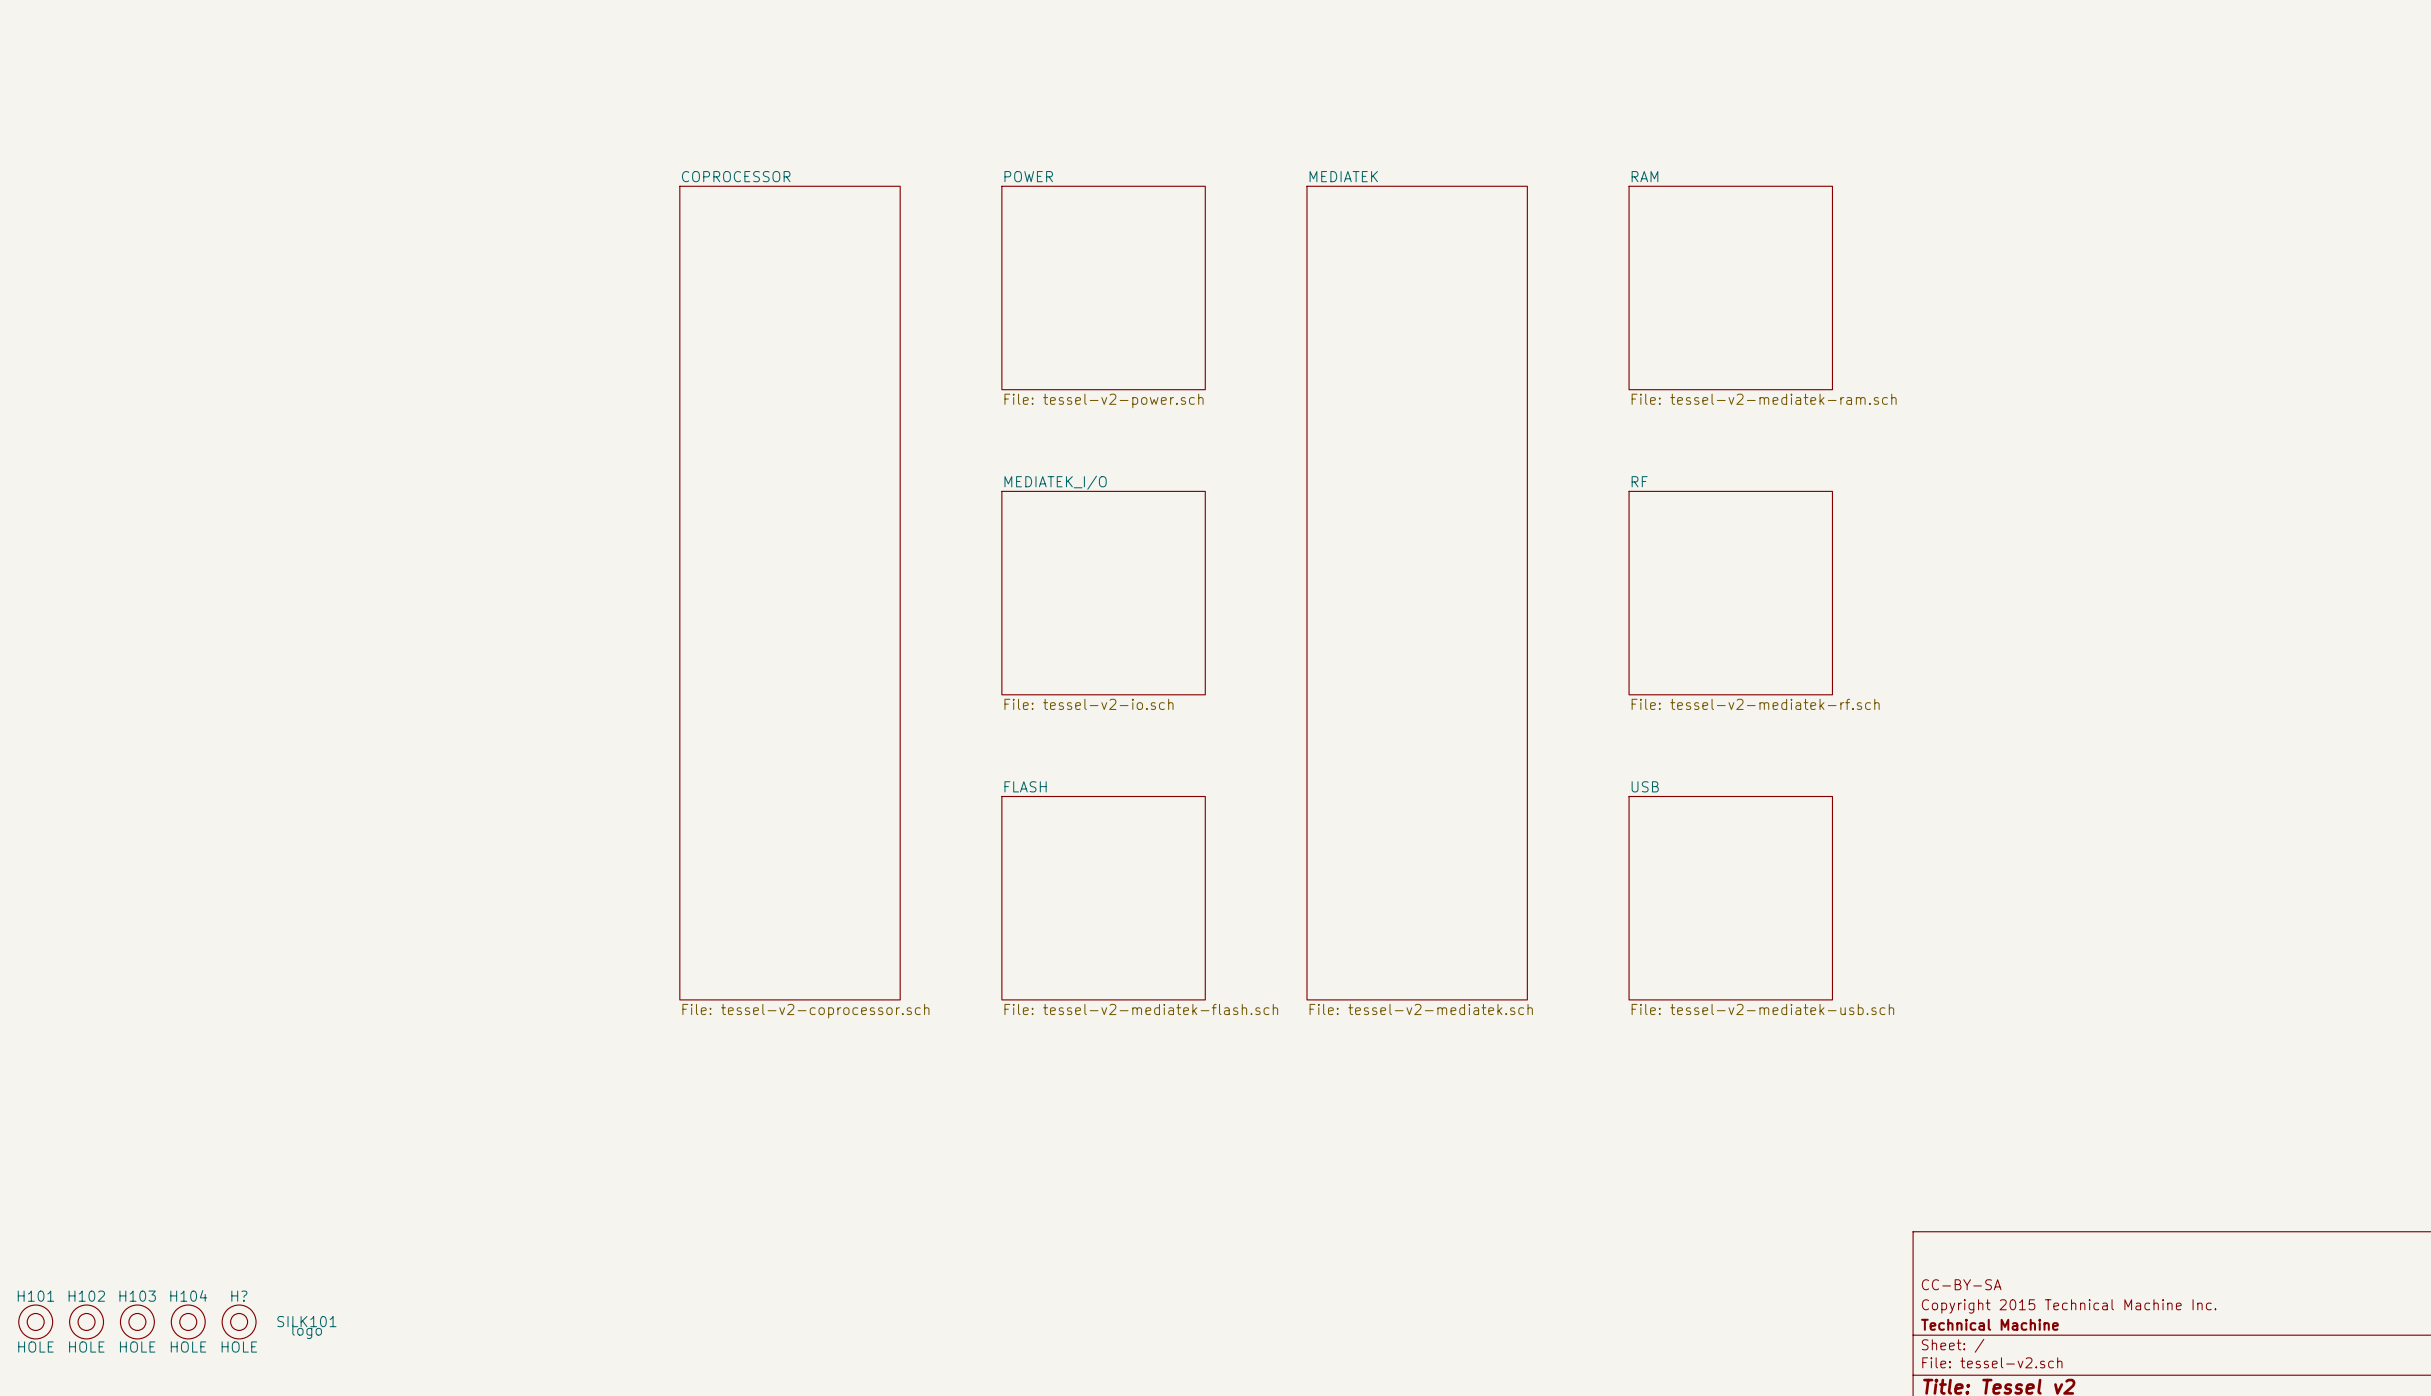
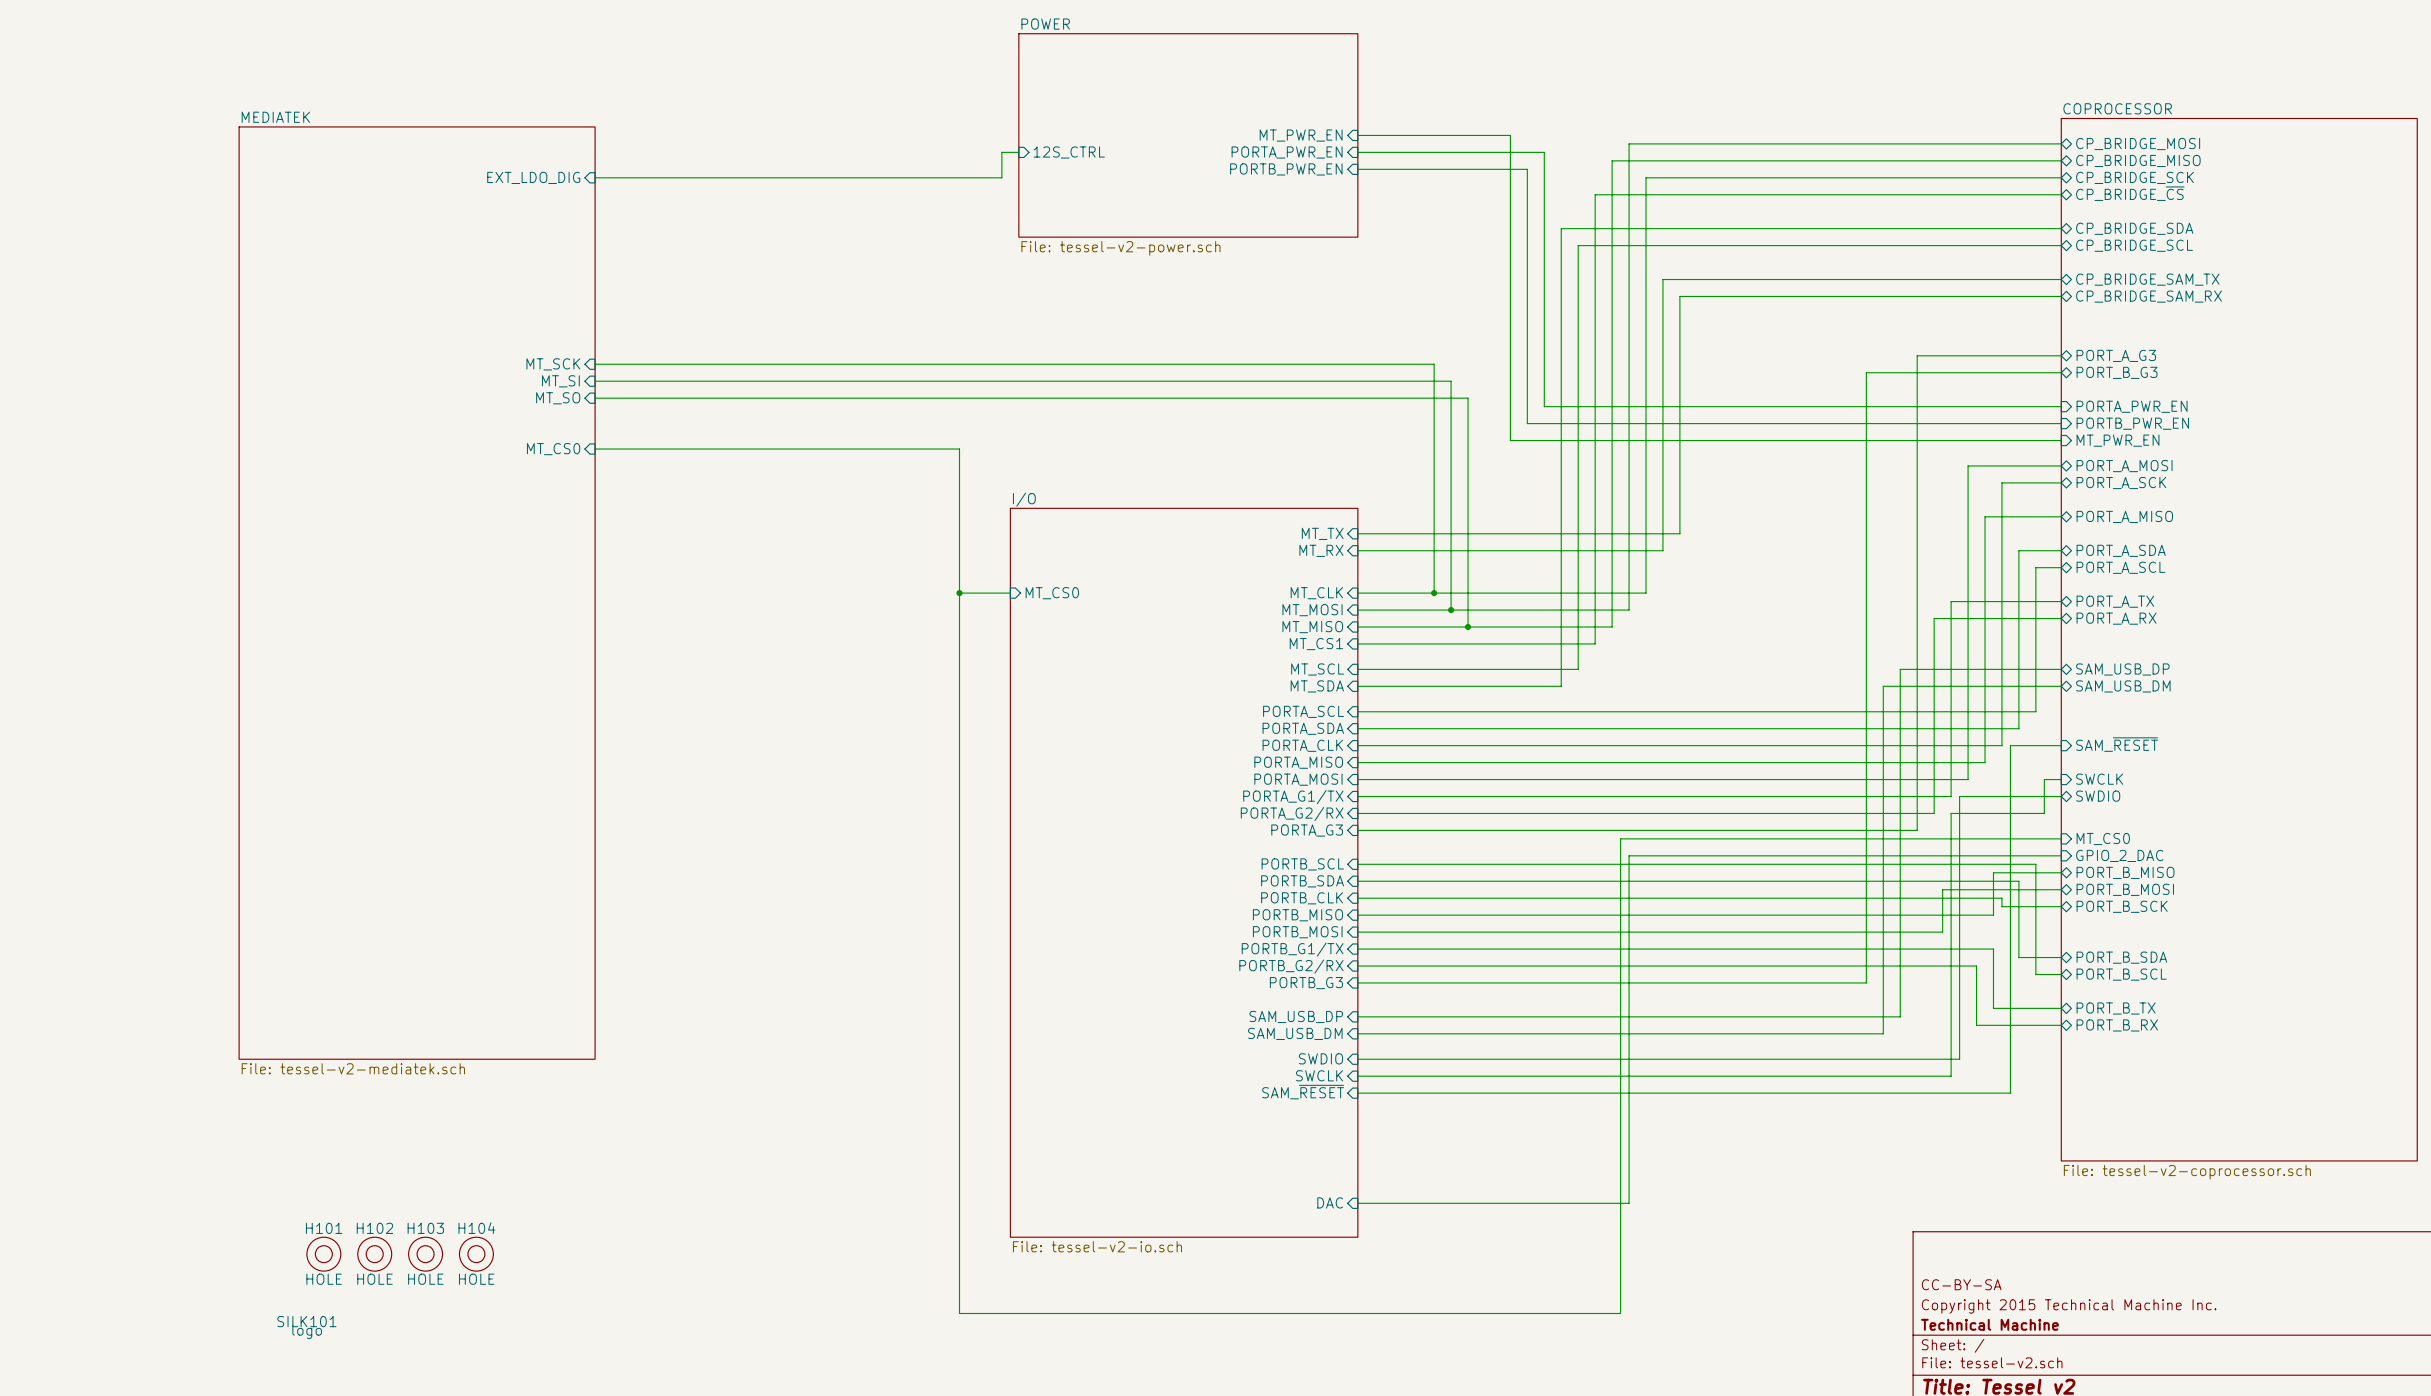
sheet POWER: none -> File: tessel-v2-power.sch (1188, 135)
sheet pin: none -> MT_PWR_EN (1301, 135)
wire: none -> (1357, 135) (1510, 135) (1510, 440) (2061, 440)
wire: none -> (2061, 143) (1629, 143) (1629, 610) (1357, 610)
sheet pin: none -> CP_BRIDGE_MOSI (2138, 144)
wire: none -> (1018, 152) (1001, 152) (1001, 177) (595, 177)
sheet pin: none -> 12S_CTRL (1069, 152)
sheet pin: none -> PORTA_PWR_EN (1287, 152)
wire: none -> (1357, 152) (1544, 152) (1544, 406) (2061, 406)
wire: none -> (2061, 160) (1612, 160) (1612, 627) (1357, 627)
sheet pin: none -> CP_BRIDGE_MISO (2138, 160)
sheet pin: none -> PORTB_PWR_EN (1286, 169)
wire: none -> (1357, 169) (1527, 169) (1527, 423) (2061, 423)
sheet pin: none -> EXT_LDO_DIG (533, 177)
wire: none -> (2061, 177) (1646, 177) (1646, 593) (1357, 593)
sheet pin: none -> CP_BRIDGE_SCK (2134, 177)
sheet pin: none -> CP_BRIDGE_~{CS} (2130, 193)
wire: none -> (2061, 194) (1595, 194) (1595, 643) (1357, 643)
wire: none -> (2061, 228) (1561, 228) (1561, 686) (1357, 686)
sheet pin: none -> CP_BRIDGE_SDA (2134, 228)
wire: none -> (2061, 245) (1578, 245) (1578, 669) (1357, 669)
sheet pin: none -> CP_BRIDGE_SCL (2134, 245)
wire: none -> (2061, 279) (1662, 279) (1662, 550) (1357, 550)
sheet pin: none -> CP_BRIDGE_SAM_TX (2147, 279)
sheet POWER: File: tessel-v2-power.sch (1103, 287) -> none
sheet RAM: File: tessel-v2-mediatek-ram.sch (1730, 287) -> none
wire: none -> (2061, 296) (1679, 296) (1679, 533) (1357, 533)
sheet pin: none -> CP_BRIDGE_SAM_RX (2149, 296)
wire: none -> (2061, 355) (1917, 355) (1917, 830) (1357, 830)
sheet pin: none -> PORT_A_G3 (2116, 355)
sheet pin: none -> MT_SCK (553, 364)
wire: none -> (595, 364) (1434, 364) (1434, 593)
wire: none -> (2061, 372) (1866, 372) (1866, 982) (1357, 982)
sheet pin: none -> PORT_B_G3 (2117, 372)
sheet pin: none -> MT_SI (560, 381)
wire: none -> (595, 381) (1451, 381) (1451, 610)
sheet pin: none -> MT_SO (558, 398)
wire: none -> (595, 398) (1468, 398) (1468, 627)
sheet pin: none -> PORTA_PWR_EN (2132, 406)
sheet pin: none -> PORTB_PWR_EN (2132, 423)
sheet pin: none -> MT_PWR_EN (2118, 440)
sheet pin: none -> MT_CS0 (553, 449)
wire: none -> (595, 449) (959, 449) (959, 1313) (1620, 1313) (1620, 838) (2061, 838)
wire: none -> (2061, 465) (1968, 465) (1968, 779) (1357, 779)
sheet pin: none -> PORT_A_MOSI (2124, 466)
wire: none -> (2061, 482) (2001, 482) (2001, 745) (1357, 745)
sheet pin: none -> PORT_A_SCK (2121, 483)
wire: none -> (2061, 516) (1985, 516) (1985, 762) (1357, 762)
sheet pin: none -> PORT_A_MISO (2124, 516)
sheet pin: none -> MT_TX (1322, 533)
sheet pin: none -> MT_RX (1321, 550)
wire: none -> (2061, 550) (2018, 550) (2018, 728) (1357, 728)
sheet pin: none -> PORT_A_SDA (2121, 550)
wire: none -> (2061, 567) (2035, 567) (2035, 711) (1357, 711)
sheet pin: none -> PORT_A_SCL (2120, 567)
sheet MEDIATEK: none -> File: tessel-v2-mediatek.sch (417, 593)
sheet COPROCESSOR: File: tessel-v2-coprocessor.sch (790, 593) -> none
wire: none -> (959, 593) (1010, 593)
junction: none -> (959, 593)
sheet pin: none -> MT_CS0 (1052, 593)
sheet MEDIATEK_I/O: File: tessel-v2-io.sch (1103, 593) -> none
sheet pin: none -> MT_CLK (1316, 593)
sheet MEDIATEK: File: tessel-v2-mediatek.sch (1417, 593) -> none
junction: none -> (1434, 593)
sheet RF: File: tessel-v2-mediatek-rf.sch (1730, 593) -> none
wire: none -> (2061, 601) (1951, 601) (1951, 796) (1357, 796)
sheet pin: none -> PORT_A_TX (2115, 601)
sheet pin: none -> MT_MOSI (1312, 610)
junction: none -> (1451, 610)
wire: none -> (2061, 618) (1934, 618) (1934, 813) (1357, 813)
sheet pin: none -> PORT_A_RX (2116, 618)
sheet pin: none -> MT_MISO (1312, 627)
junction: none -> (1468, 627)
sheet COPROCESSOR: none -> File: tessel-v2-coprocessor.sch (2239, 639)
sheet pin: none -> MT_CS1 (1316, 644)
sheet pin: none -> MT_SCL (1317, 669)
wire: none -> (2061, 669) (1900, 669) (1900, 1016) (1357, 1016)
sheet pin: none -> SAM_USB_DP (2122, 669)
sheet pin: none -> MT_SDA (1317, 686)
wire: none -> (2061, 686) (1883, 686) (1883, 1033) (1357, 1033)
sheet pin: none -> SAM_USB_DM (2123, 686)
sheet pin: none -> PORTA_SCL (1303, 711)
sheet pin: none -> PORTA_SDA (1303, 728)
sheet pin: none -> SAM_~{RESET} (2117, 744)
sheet pin: none -> PORTA_CLK (1302, 745)
wire: none -> (2061, 745) (2010, 745) (2010, 1093) (1357, 1093)
sheet pin: none -> PORTA_MISO (1298, 762)
sheet pin: none -> PORTA_MOSI (1298, 779)
wire: none -> (2061, 779) (2044, 779) (2044, 813) (1951, 813) (1951, 1076) (1357, 1076)
sheet pin: none -> SWCLK (2099, 779)
wire: none -> (2061, 796) (1959, 796) (1959, 1059) (1357, 1059)
sheet pin: none -> SWDIO (2098, 796)
sheet pin: none -> PORTA_G1/TX (1293, 797)
sheet pin: none -> PORTA_G2/RX (1292, 814)
sheet pin: none -> PORTA_G3 (1307, 830)
sheet pin: none -> MT_CS0 (2103, 838)
wire: none -> (2061, 855) (1629, 855) (1629, 1203) (1357, 1203)
sheet pin: none -> GPIO_2_DAC (2119, 855)
sheet pin: none -> PORTB_SCL (1302, 864)
wire: none -> (1357, 864) (2035, 864) (2035, 974) (2061, 974)
sheet I/O: none -> File: tessel-v2-io.sch (1184, 872)
wire: none -> (2061, 872) (1993, 872) (1993, 915) (1357, 915)
sheet pin: none -> PORT_B_MISO (2125, 872)
sheet pin: none -> PORTB_SDA (1302, 881)
wire: none -> (1357, 881) (2018, 881) (2018, 957) (2061, 957)
wire: none -> (2061, 889) (1942, 889) (1942, 932) (1357, 932)
sheet pin: none -> PORT_B_MOSI (2125, 889)
sheet FLASH: File: tessel-v2-mediatek-flash.sch (1103, 898) -> none
sheet pin: none -> PORTB_CLK (1302, 898)
wire: none -> (1357, 898) (2001, 898) (2001, 906) (2061, 906)
sheet USB: File: tessel-v2-mediatek-usb.sch (1730, 898) -> none
sheet pin: none -> PORT_B_SCK (2122, 906)
sheet pin: none -> PORTB_MISO (1297, 915)
sheet pin: none -> PORTB_MOSI (1297, 932)
sheet pin: none -> PORTB_G1/TX (1292, 949)
wire: none -> (1357, 949) (1993, 949) (1993, 1008) (2061, 1008)
sheet pin: none -> PORT_B_SDA (2121, 957)
sheet pin: none -> PORTB_G2/RX (1291, 966)
wire: none -> (1357, 966) (1976, 966) (1976, 1025) (2061, 1025)
sheet pin: none -> PORT_B_SCL (2121, 974)
sheet pin: none -> PORTB_G3 (1306, 983)
sheet pin: none -> PORT_B_TX (2116, 1008)
sheet pin: none -> SAM_USB_DP (1296, 1016)
sheet pin: none -> PORT_B_RX (2117, 1025)
sheet pin: none -> SAM_USB_DM (1295, 1033)
sheet pin: none -> SWDIO (1320, 1058)
sheet pin: none -> SWCLK (1319, 1075)
sheet pin: none -> SAM_~{RESET} (1303, 1092)
sheet pin: none -> DAC (1330, 1202)
H101 position: (35, 1321) -> (323, 1254)
H102 position: (86, 1321) -> (374, 1254)
H103 position: (137, 1321) -> (425, 1254)
H104 position: (188, 1321) -> (476, 1254)
H?: HOLE (239, 1321) -> none

